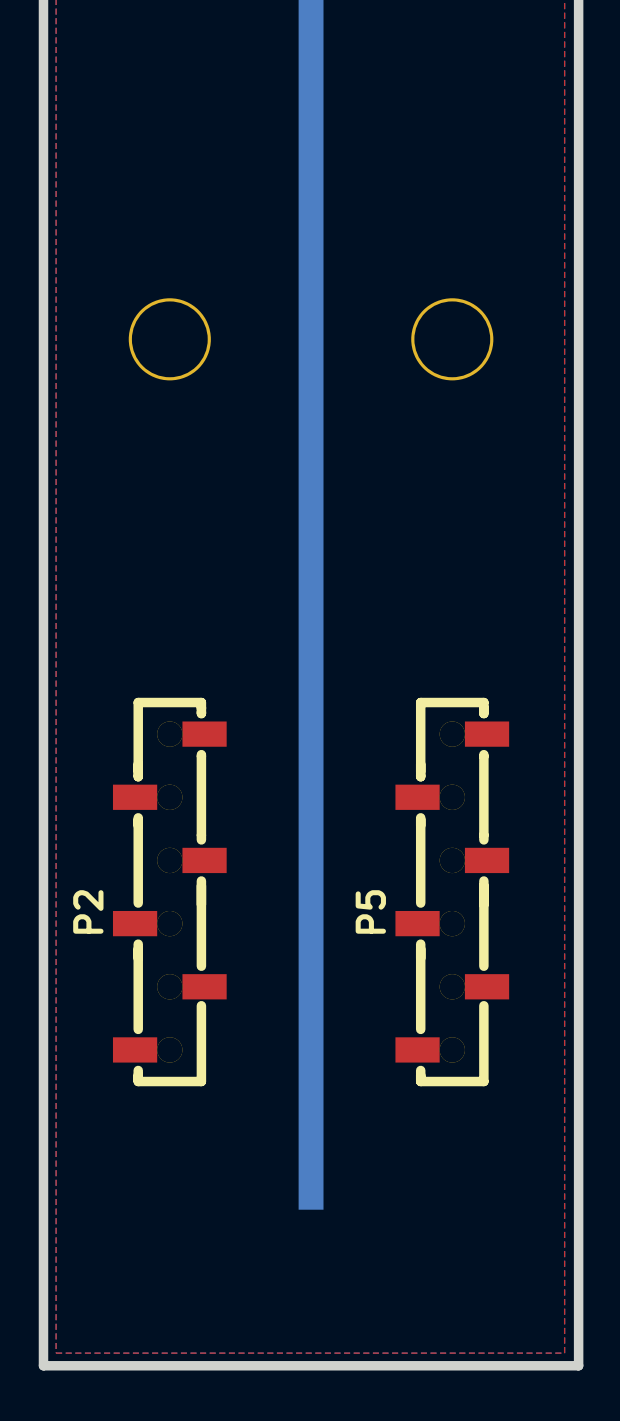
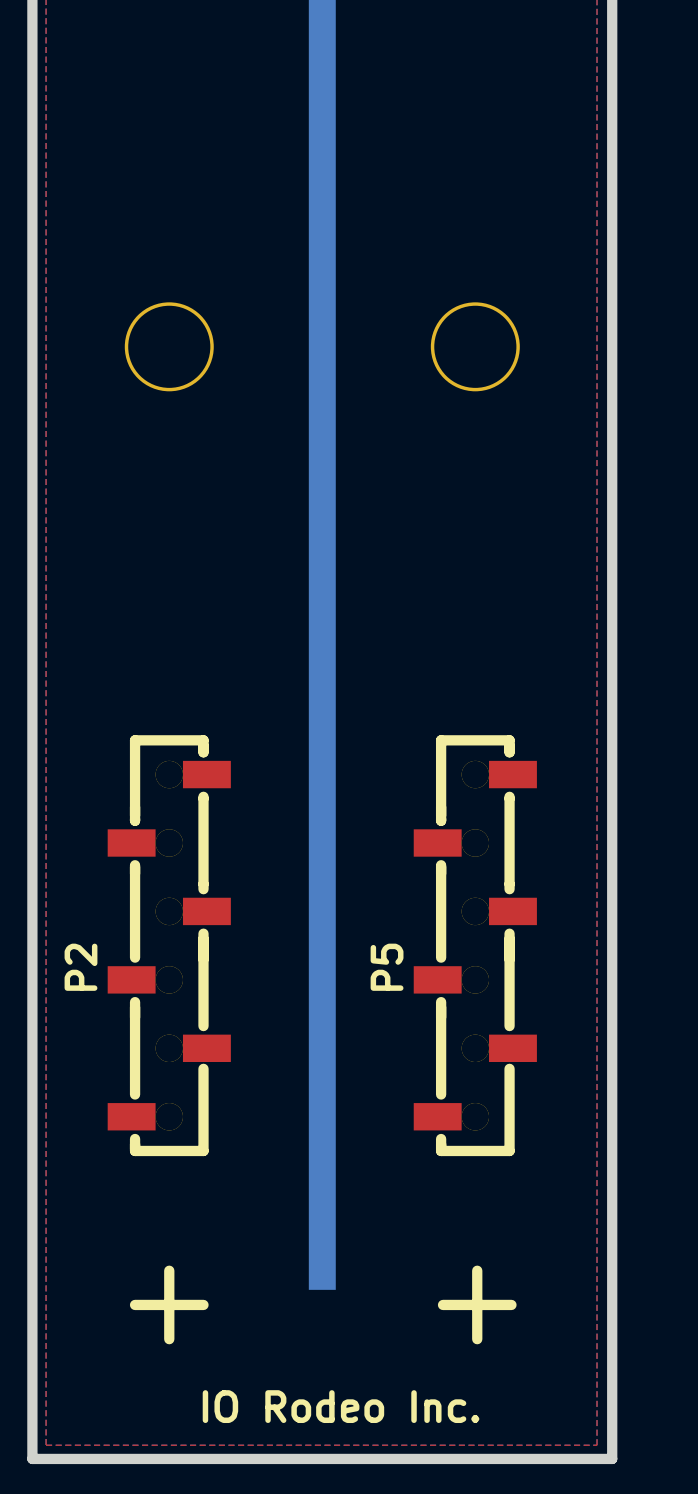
line: none -> (169, 1270) (169, 1339)
line: none -> (477, 1270) (477, 1339)
line: none -> (135, 1304) (203, 1304)
line: none -> (443, 1304) (511, 1304)
text: none -> IO Rodeo Inc. (341, 1406)

